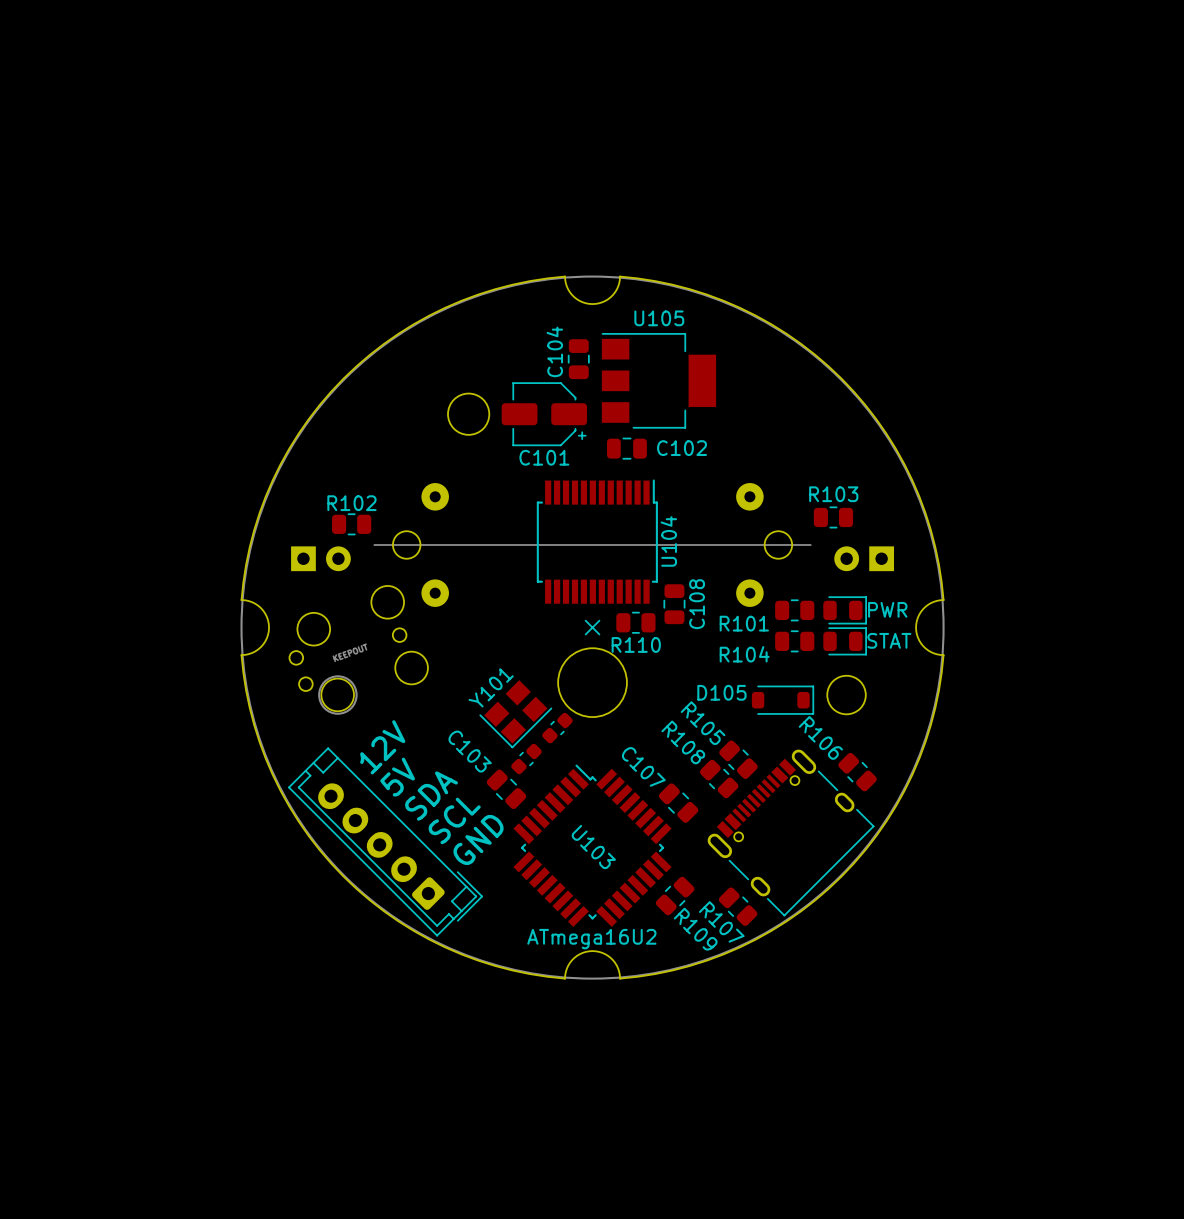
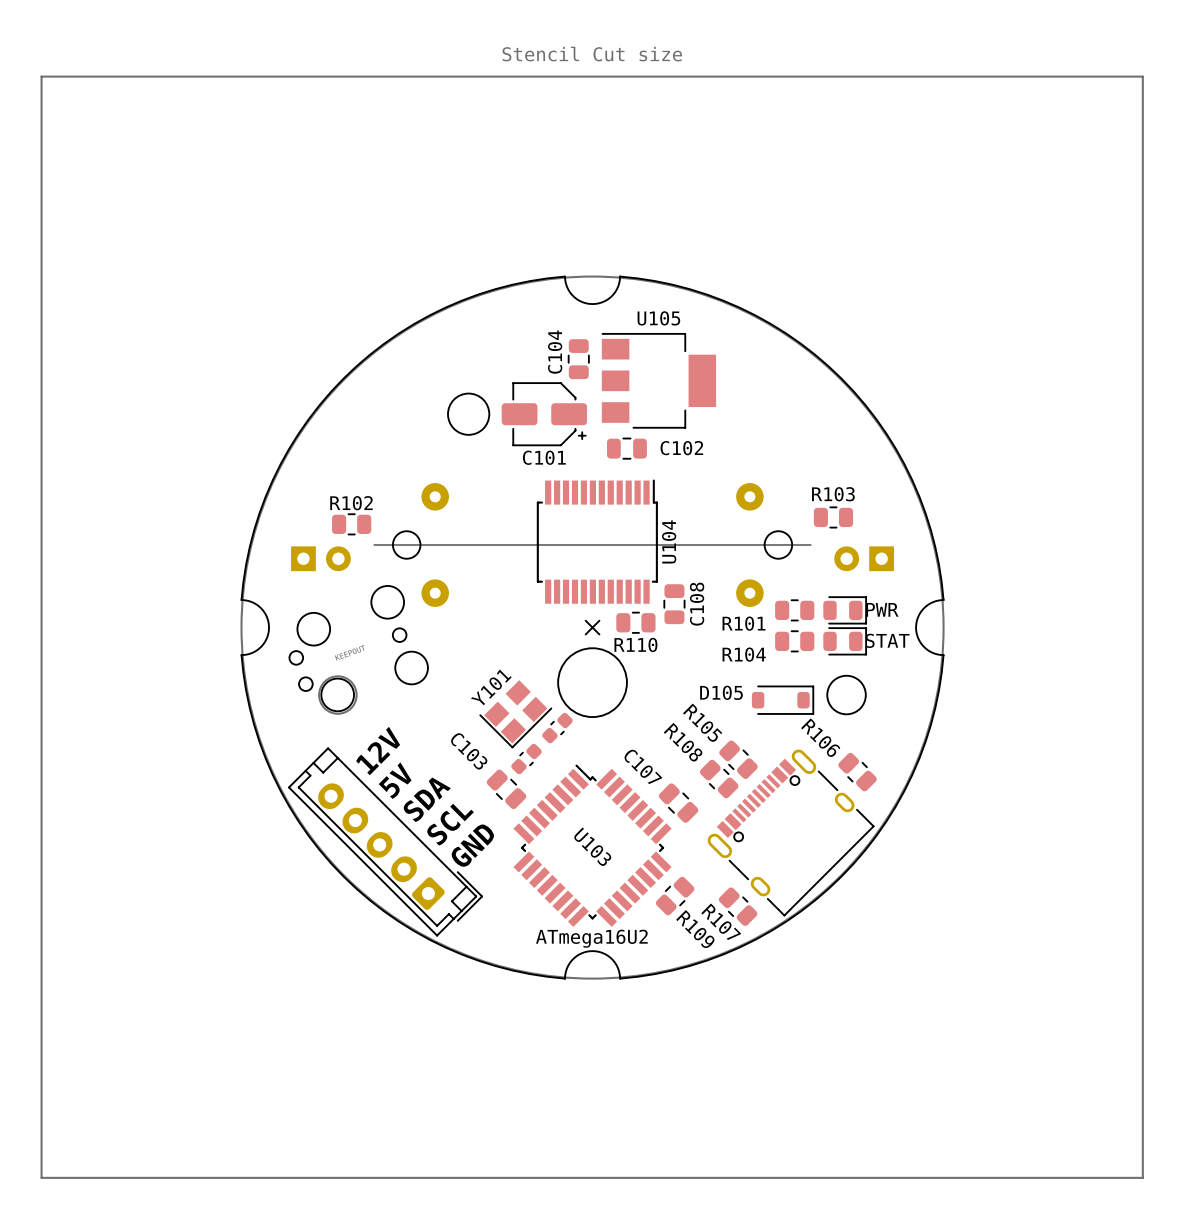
text: none -> Stencil Cut size (592, 54)
line: none -> (41, 76) (1142, 76) (1142, 1177) (41, 1177) (41, 76)

